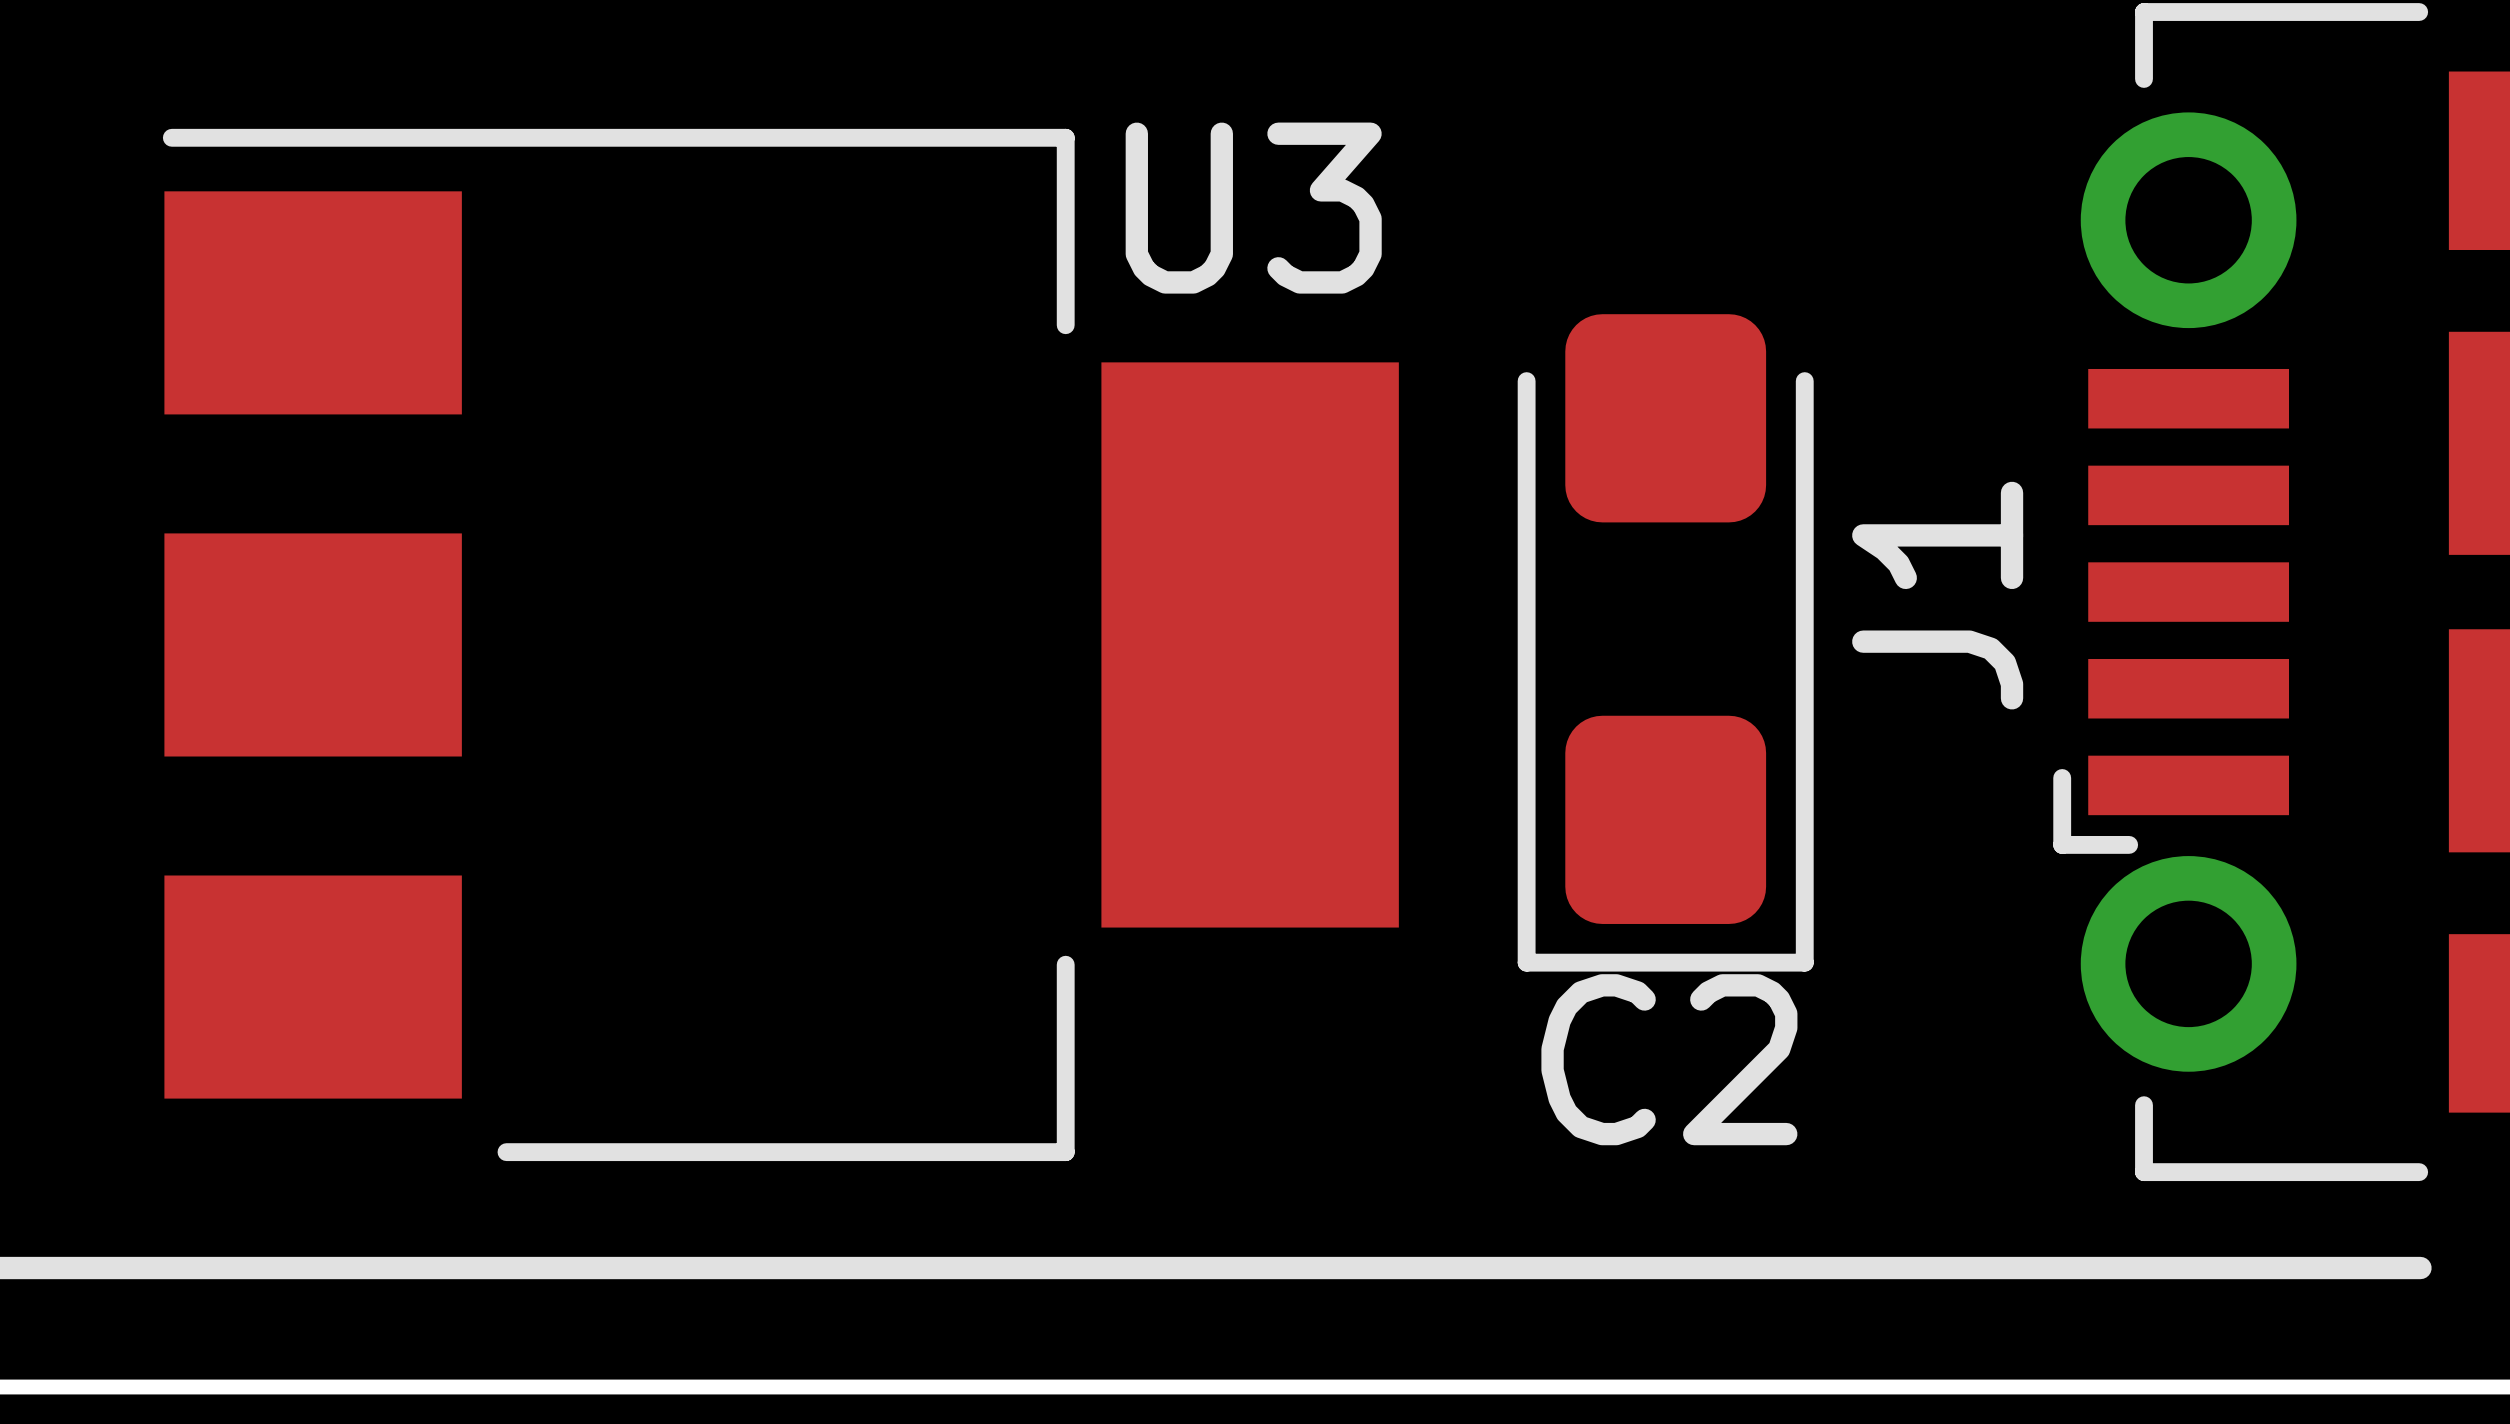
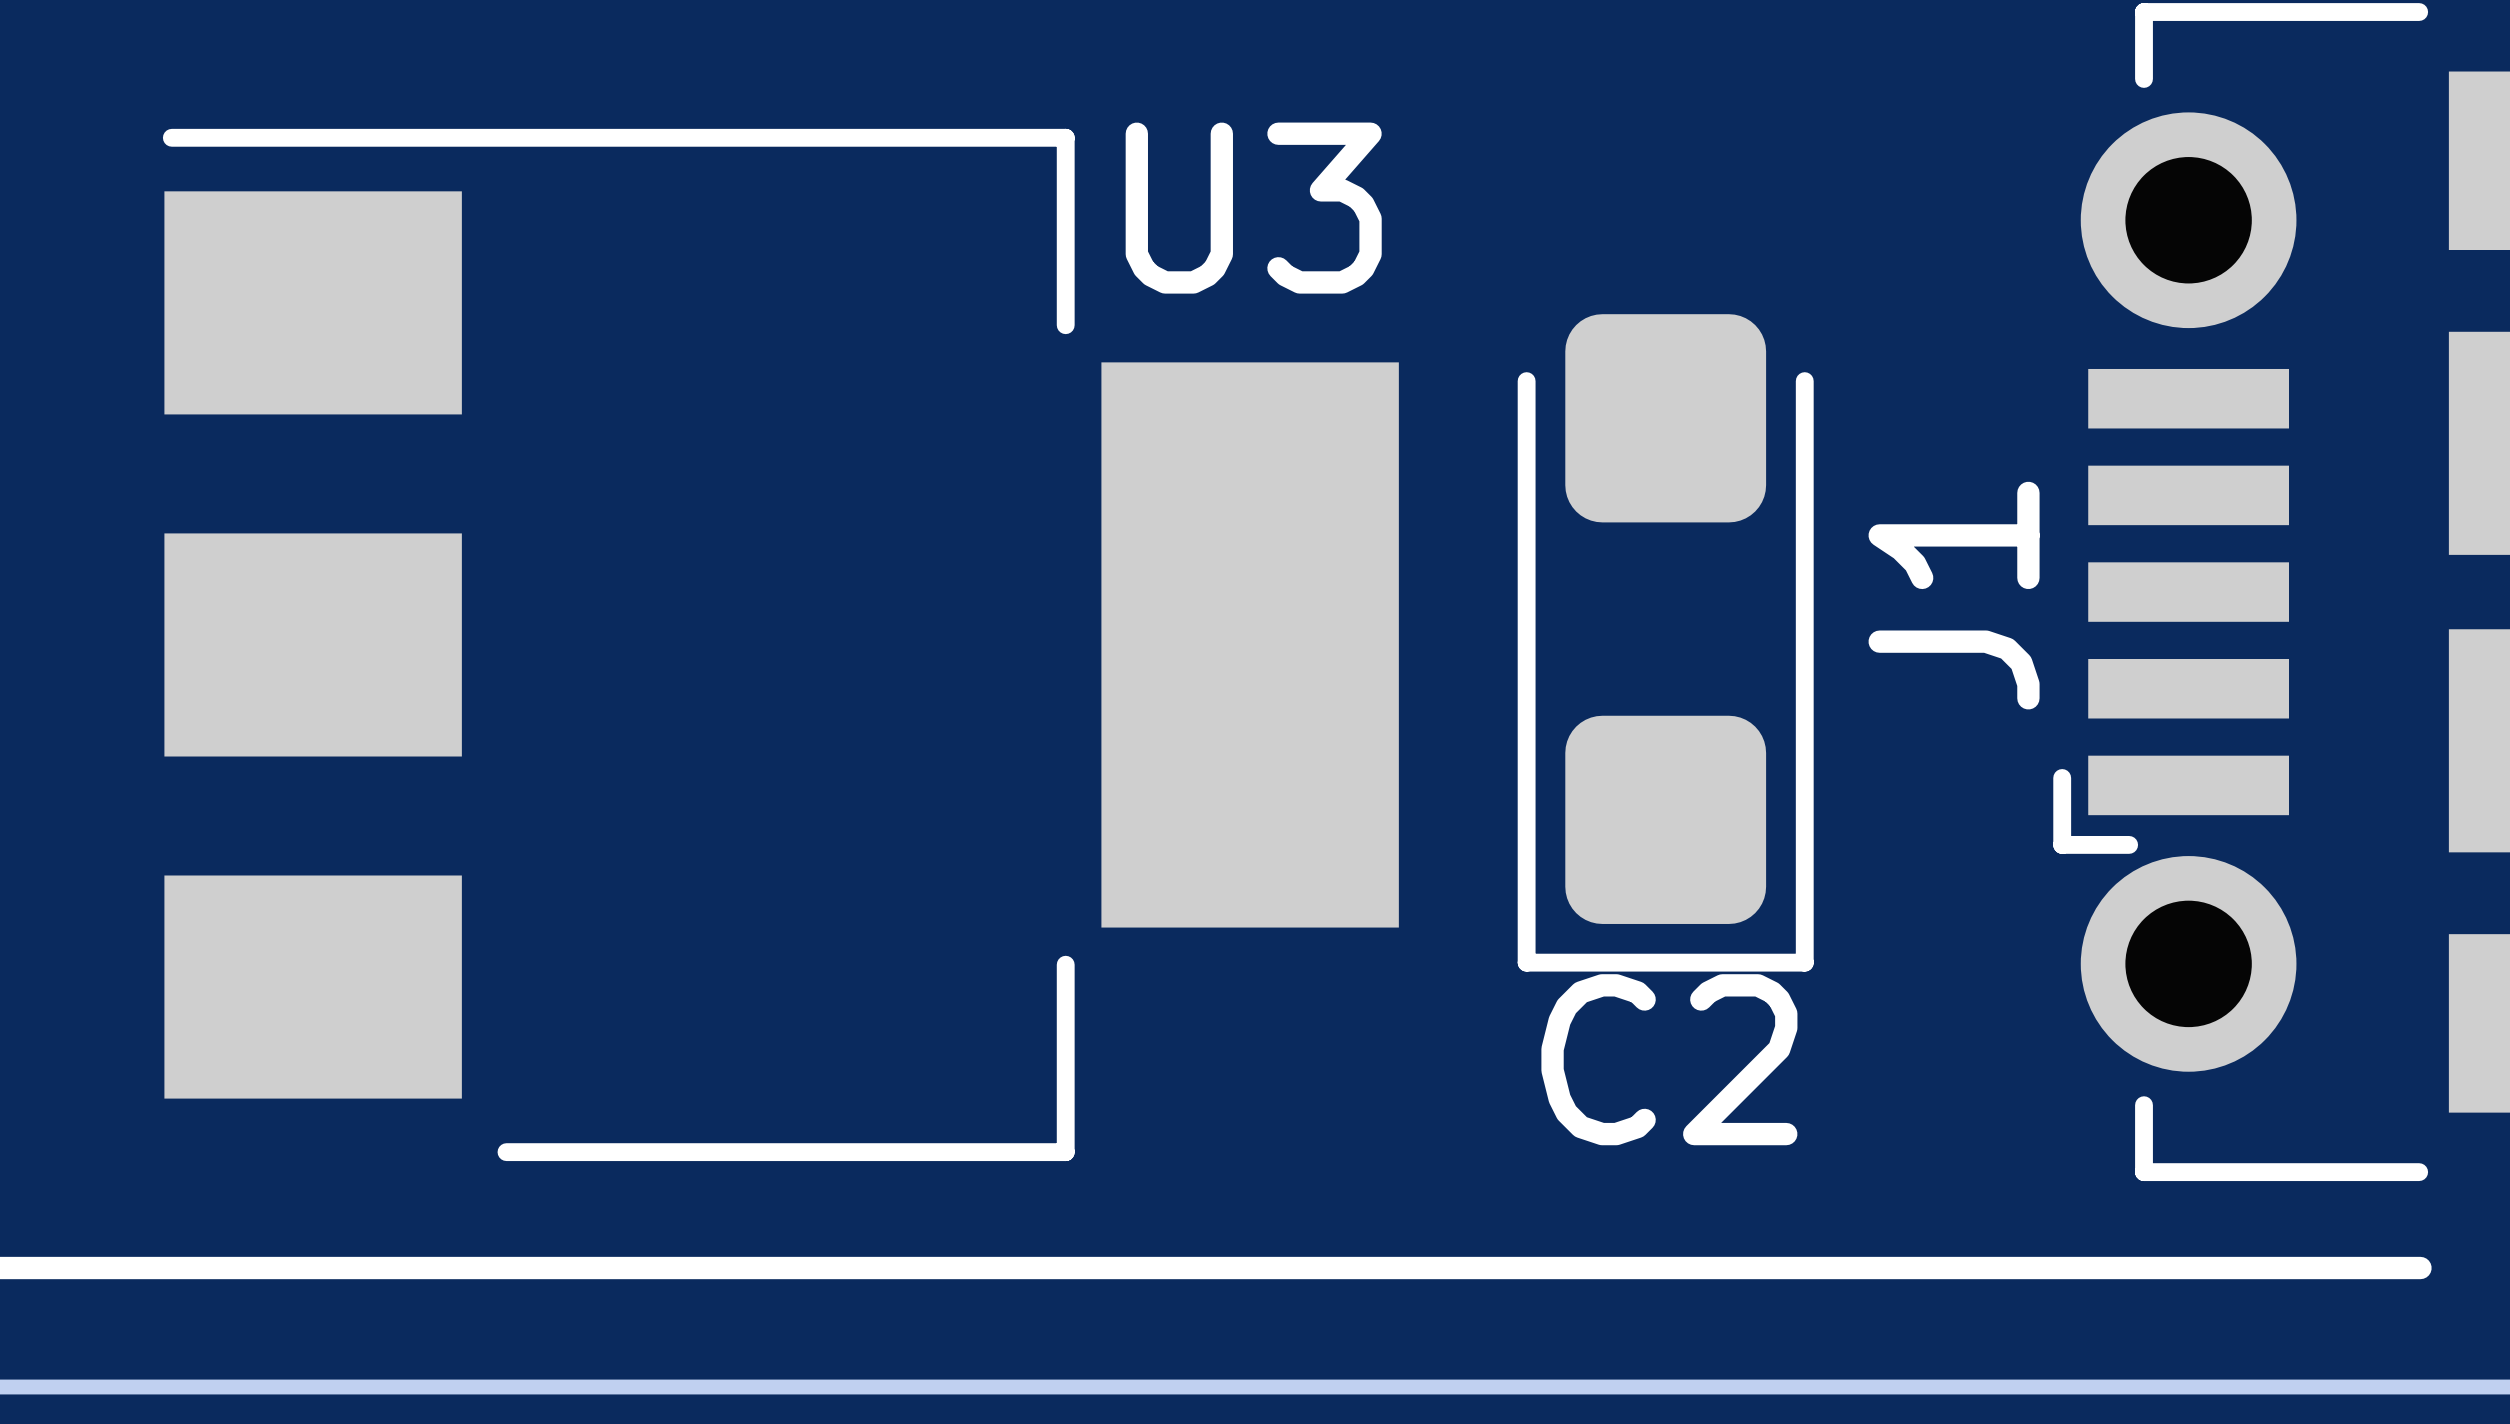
J1 name position: J1 (1937, 595) -> J1 (1954, 595)

